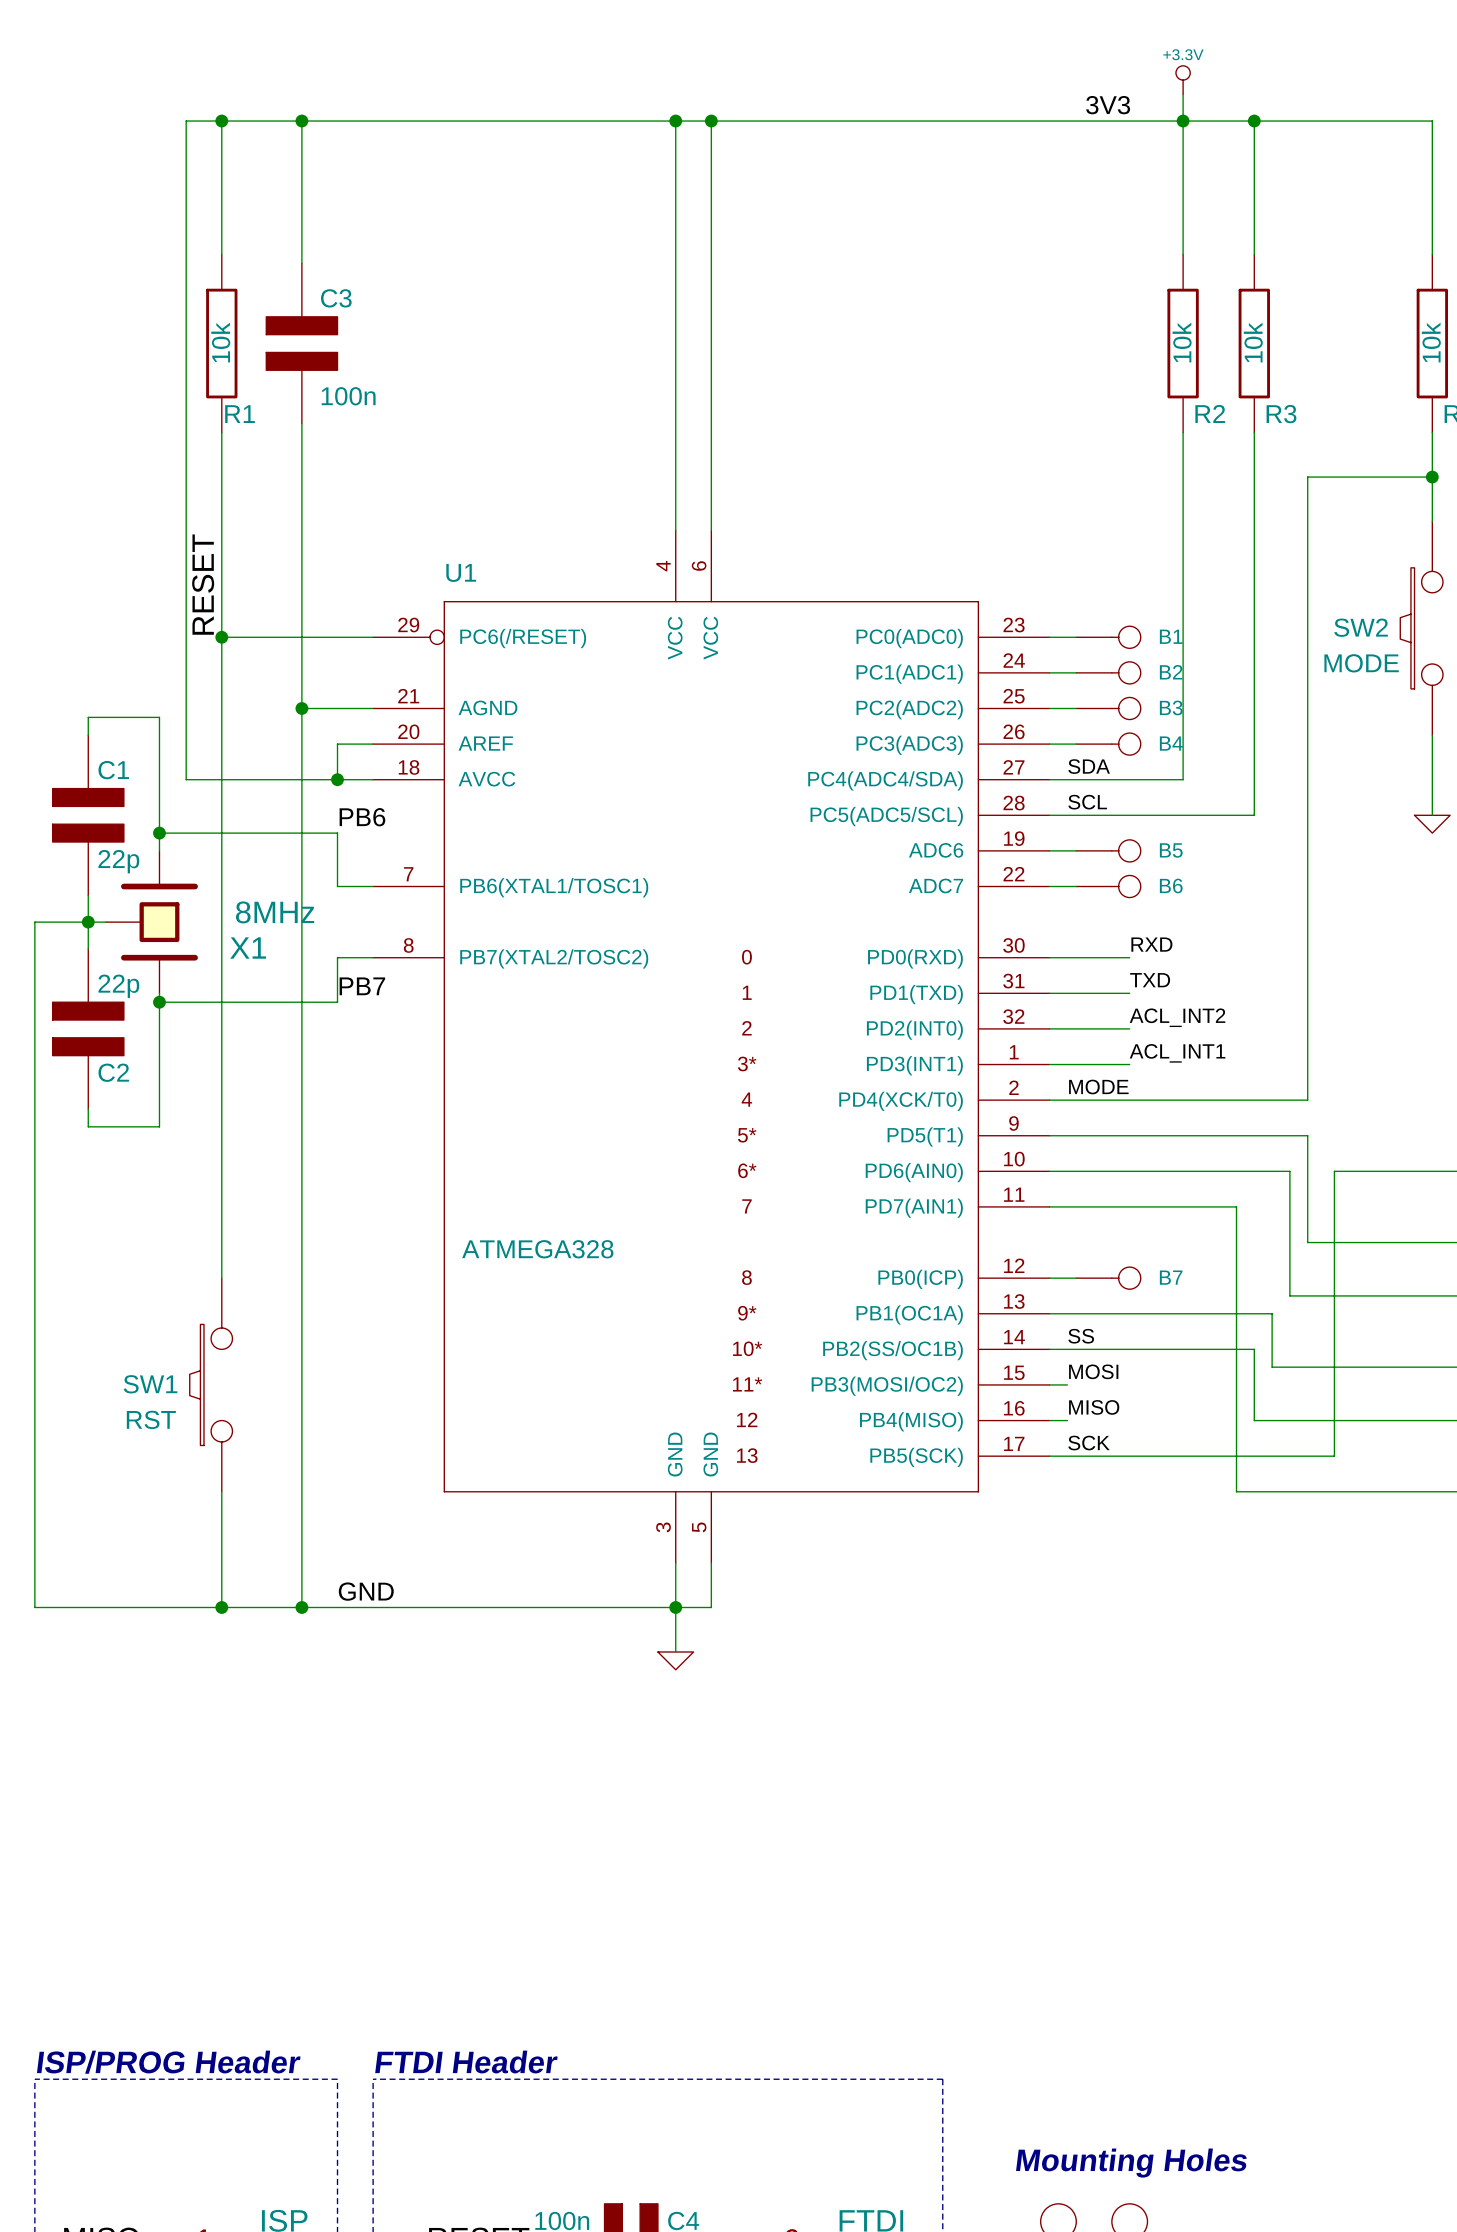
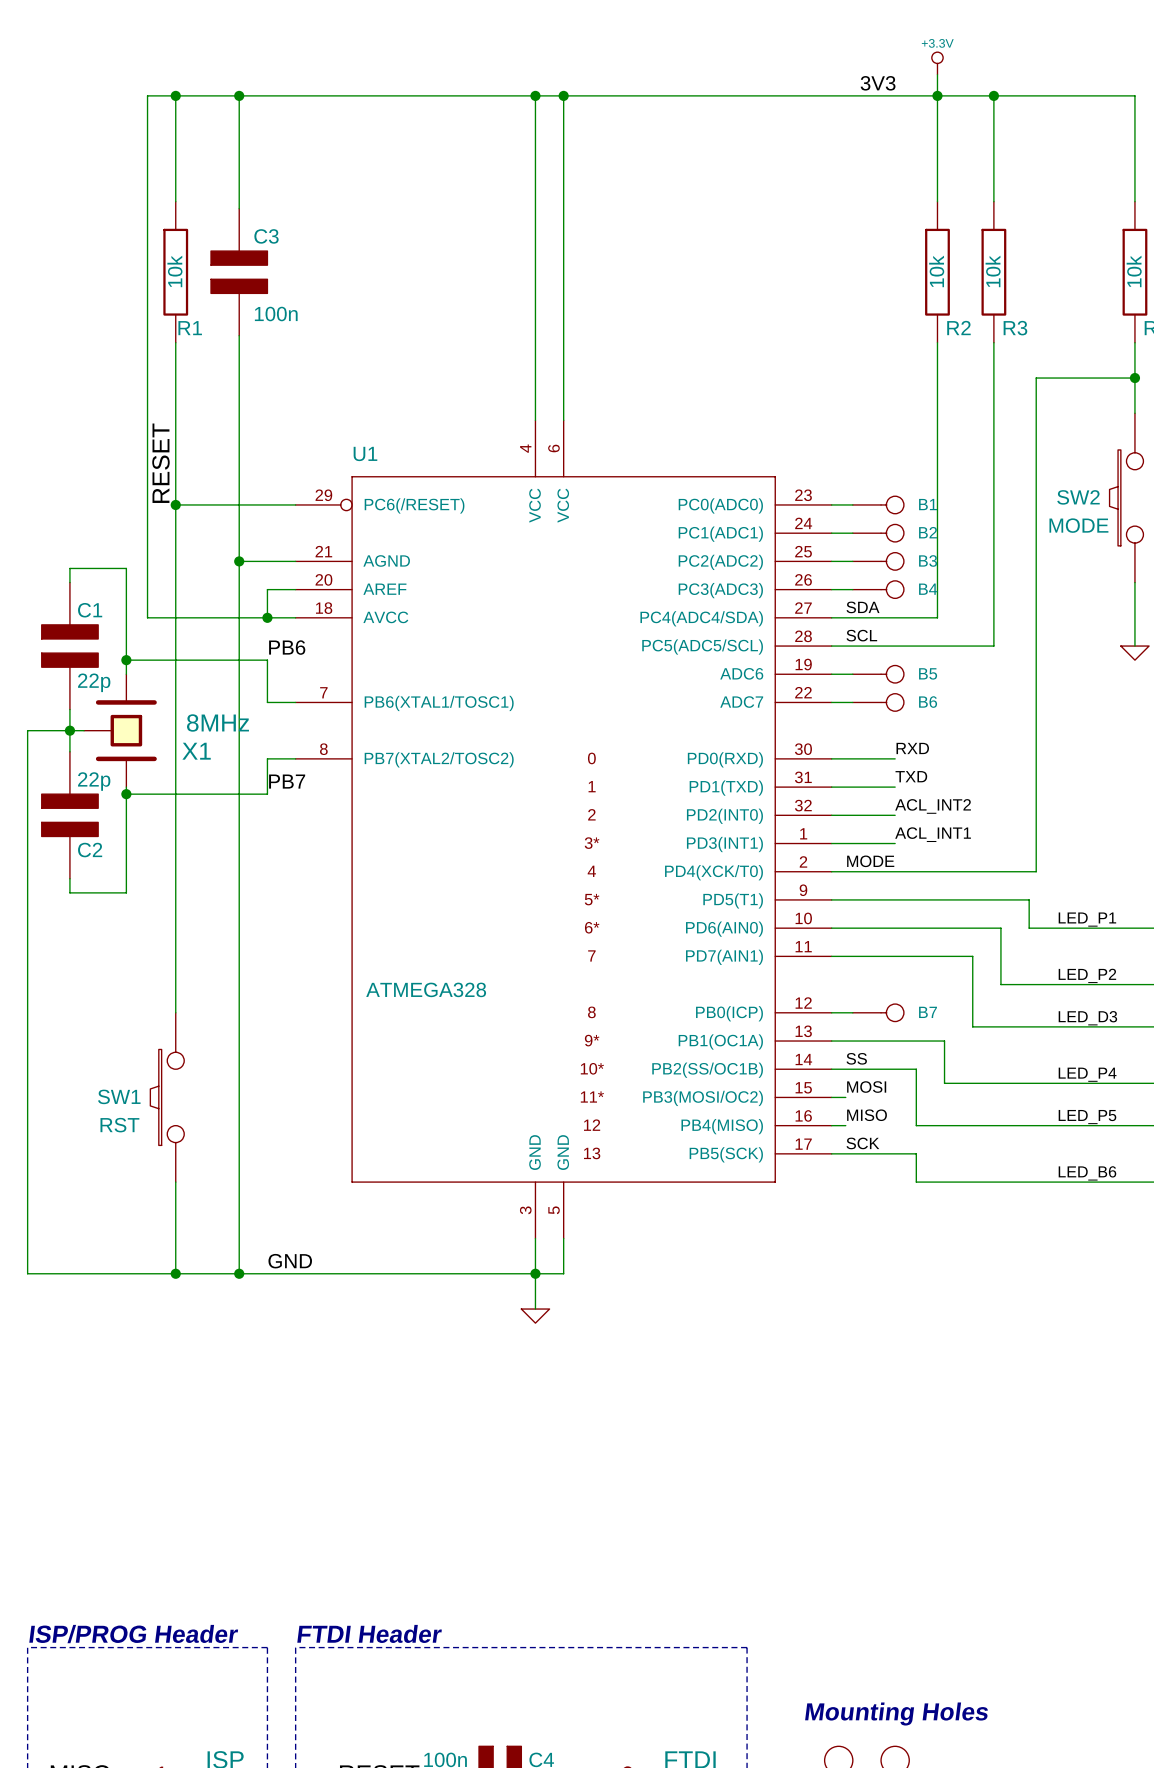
wire: (1298, 1135) (1307, 1135) (1307, 1242) -> (1000, 928) (1000, 984) (1036, 984)
label: none -> LED_P1 (1087, 919)
wire: (1263, 1171) (1289, 1171) (1289, 1295) -> (972, 956) (972, 1026) (1022, 1026)
wire: (1334, 1171) (1334, 1456) (1156, 1456) -> (1057, 928) (1029, 928) (1029, 899)
wire: (1227, 1206) (1236, 1206) (1236, 1491) -> (916, 1153) (916, 1182) (979, 1182)
label: none -> LED_P2 (1087, 975)
label: none -> LED_D3 (1087, 1018)
wire: (1191, 1313) (1272, 1313) (1272, 1367) -> (944, 1041) (944, 1083) (1008, 1083)
wire: (1156, 1349) (1254, 1349) (1254, 1420) -> (916, 1069) (916, 1125) (993, 1125)
label: none -> LED_P4 (1087, 1074)
label: none -> LED_P5 (1087, 1117)
label: none -> LED_B6 (1087, 1173)

